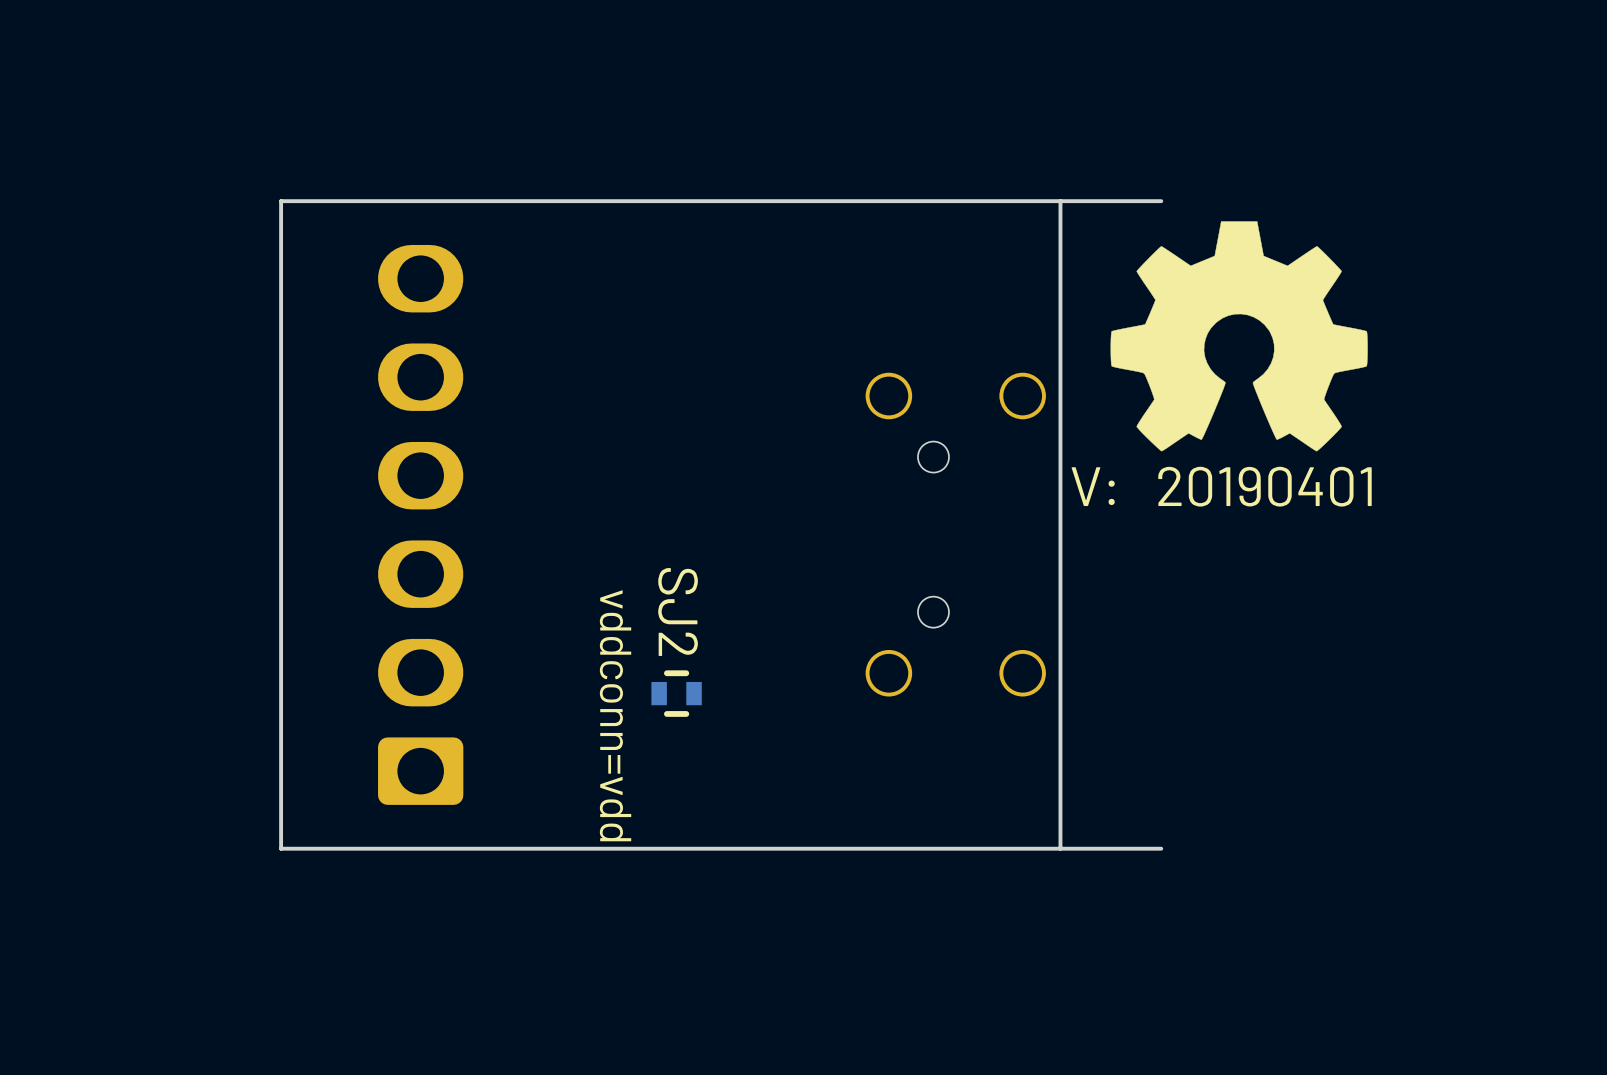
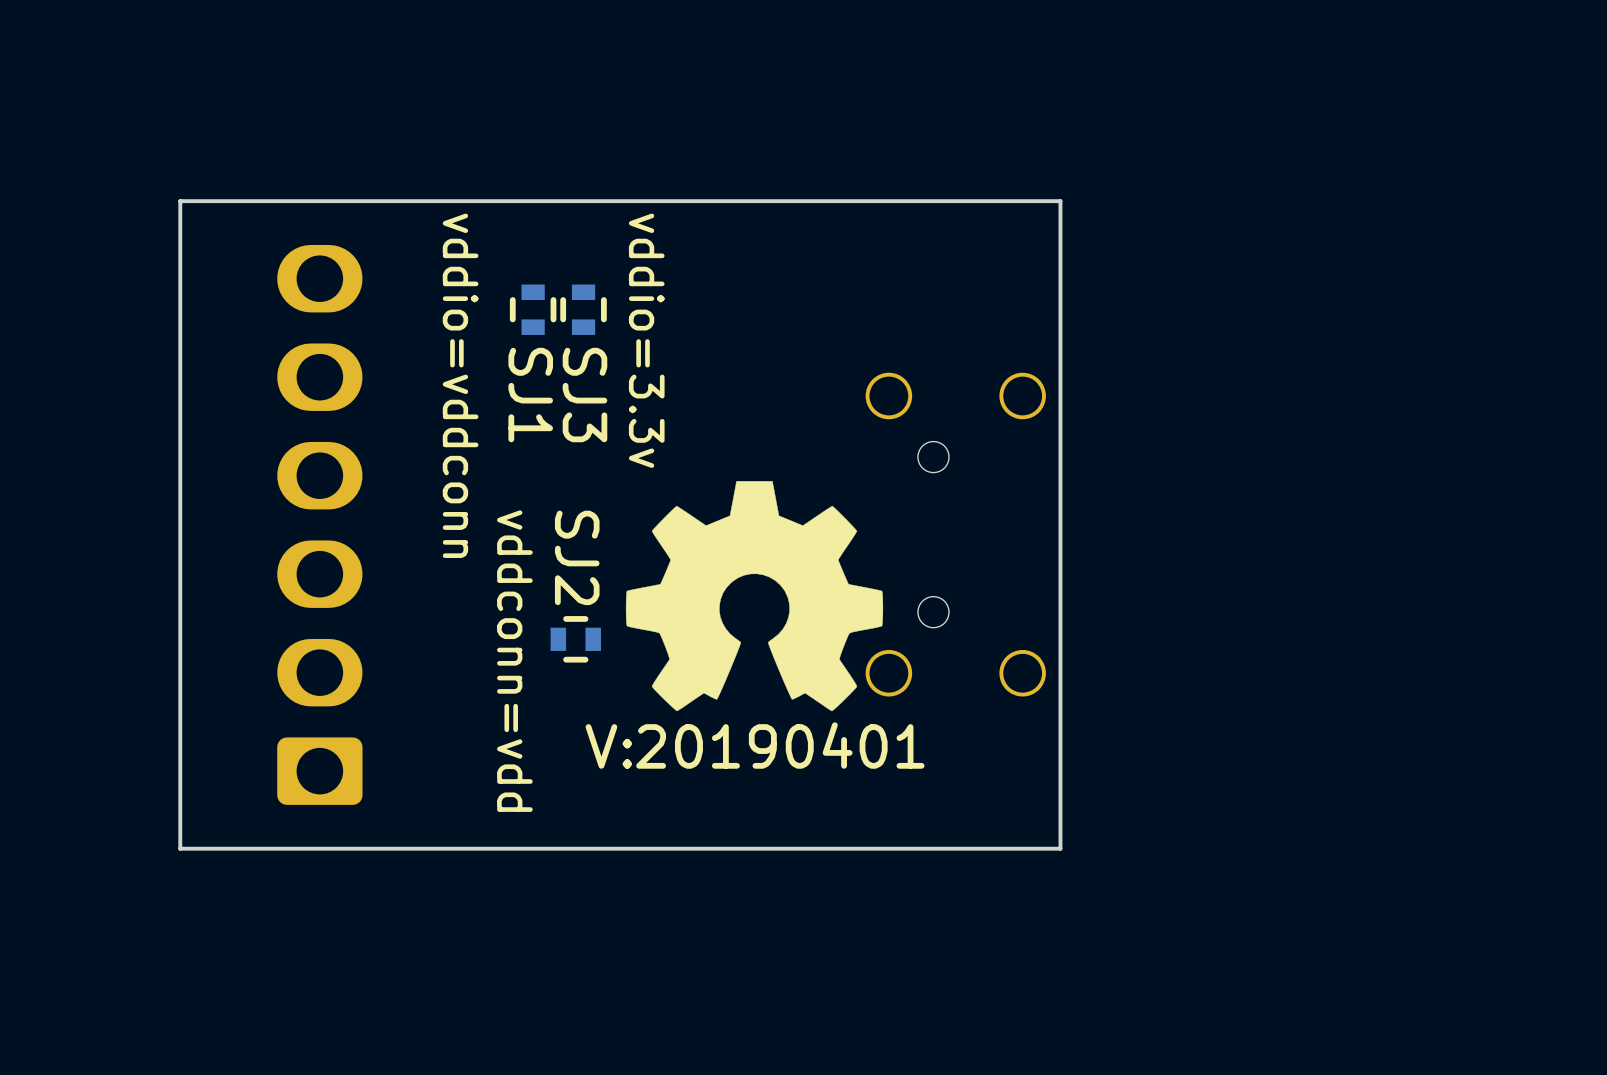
board edge: (281, 201) (281, 848) -> (281, 201) (180, 201) (180, 848) (281, 848)
board edge: (1161, 201) (1060, 201) -> none
SJ1: none -> vddio=vddconn (533, 309)
SJ3: none -> vddio=3.3v (583, 309)
drawing position: (1239, 336) -> (754, 596)
drawing position: (1221, 486) -> (755, 745)
part position: (420, 524) -> (319, 524)
SJ2 position: (676, 693) -> (575, 639)
board edge: (1161, 848) (1060, 848) -> none

